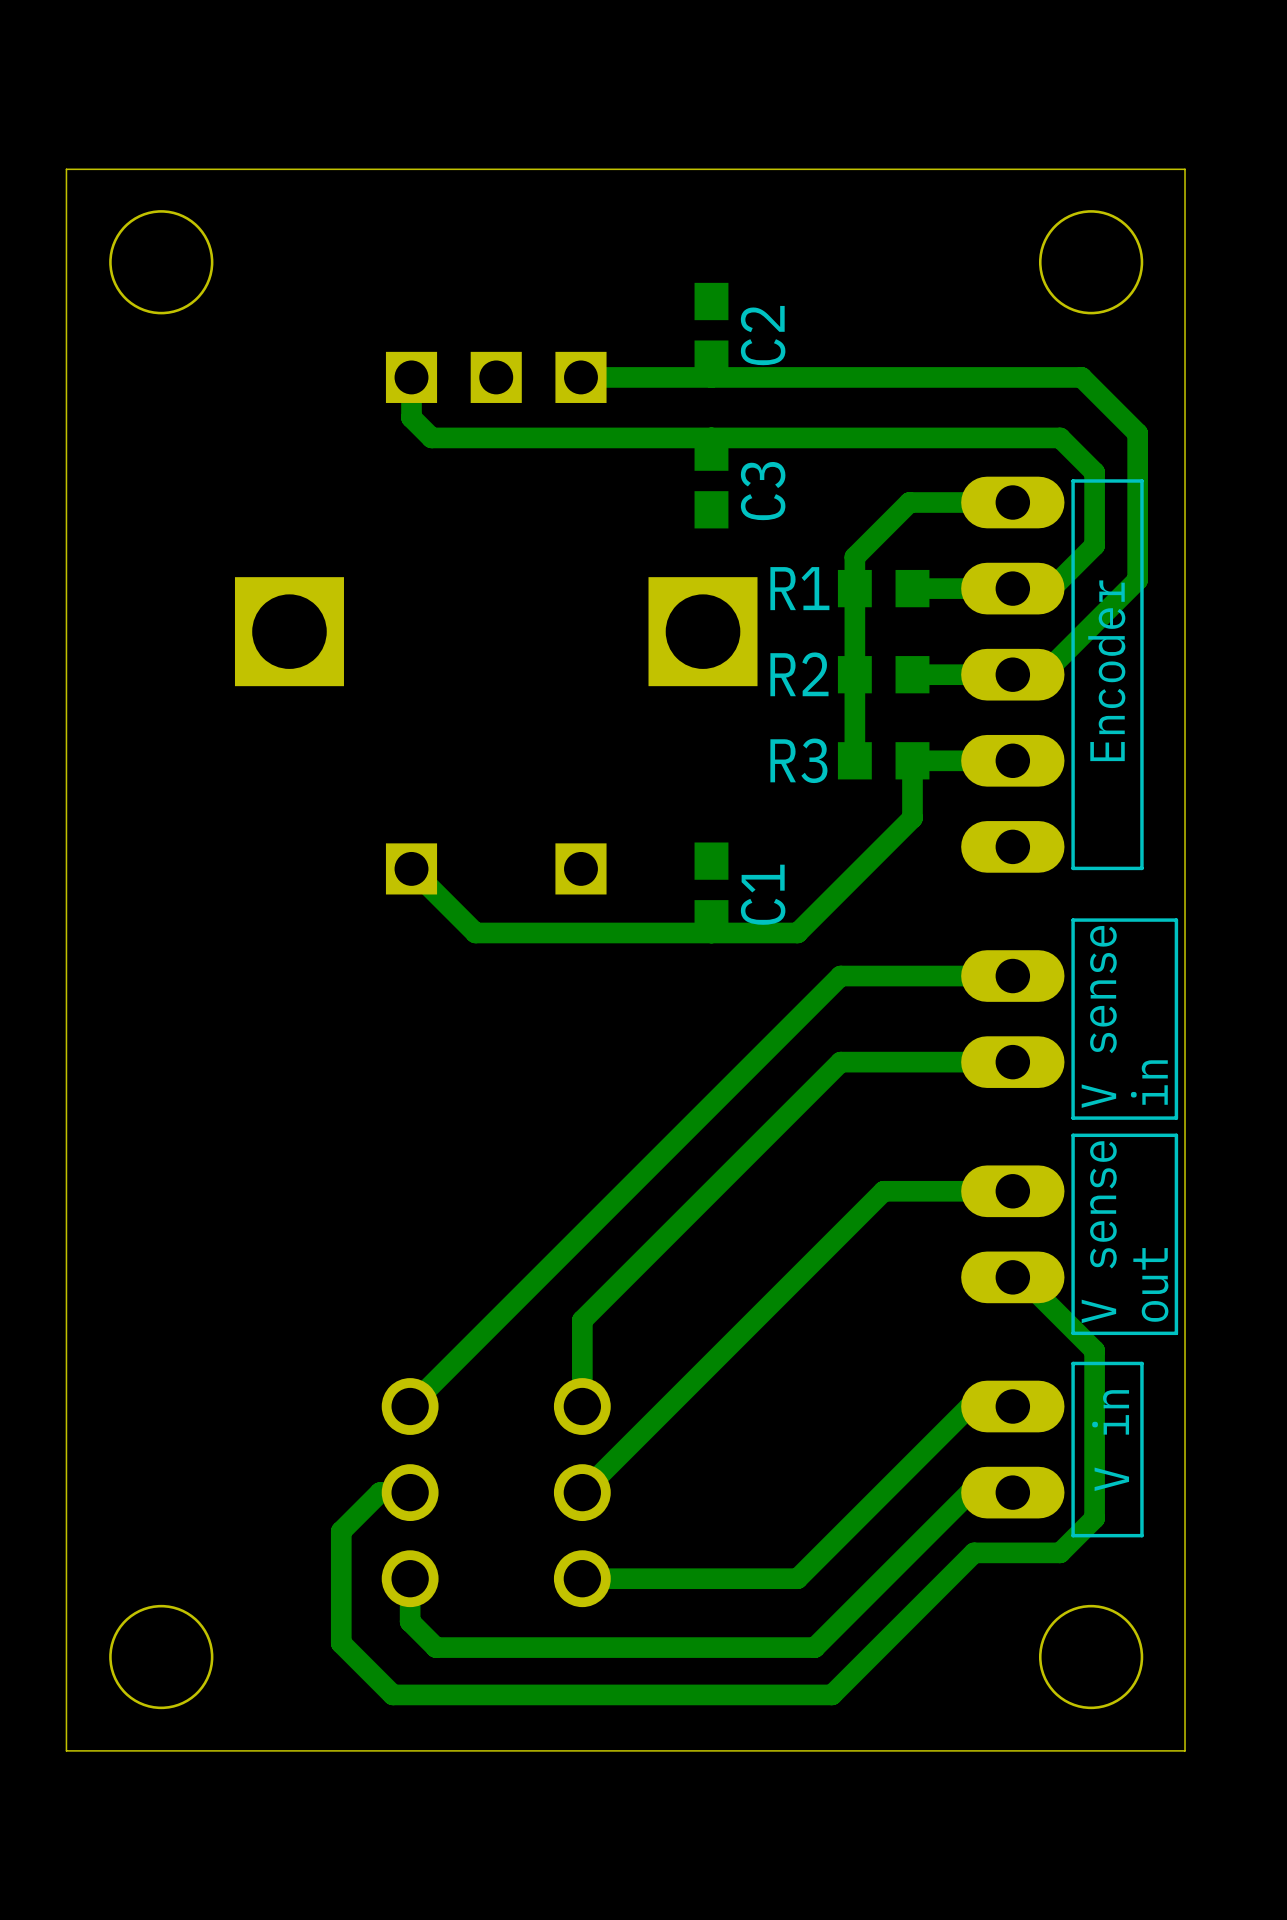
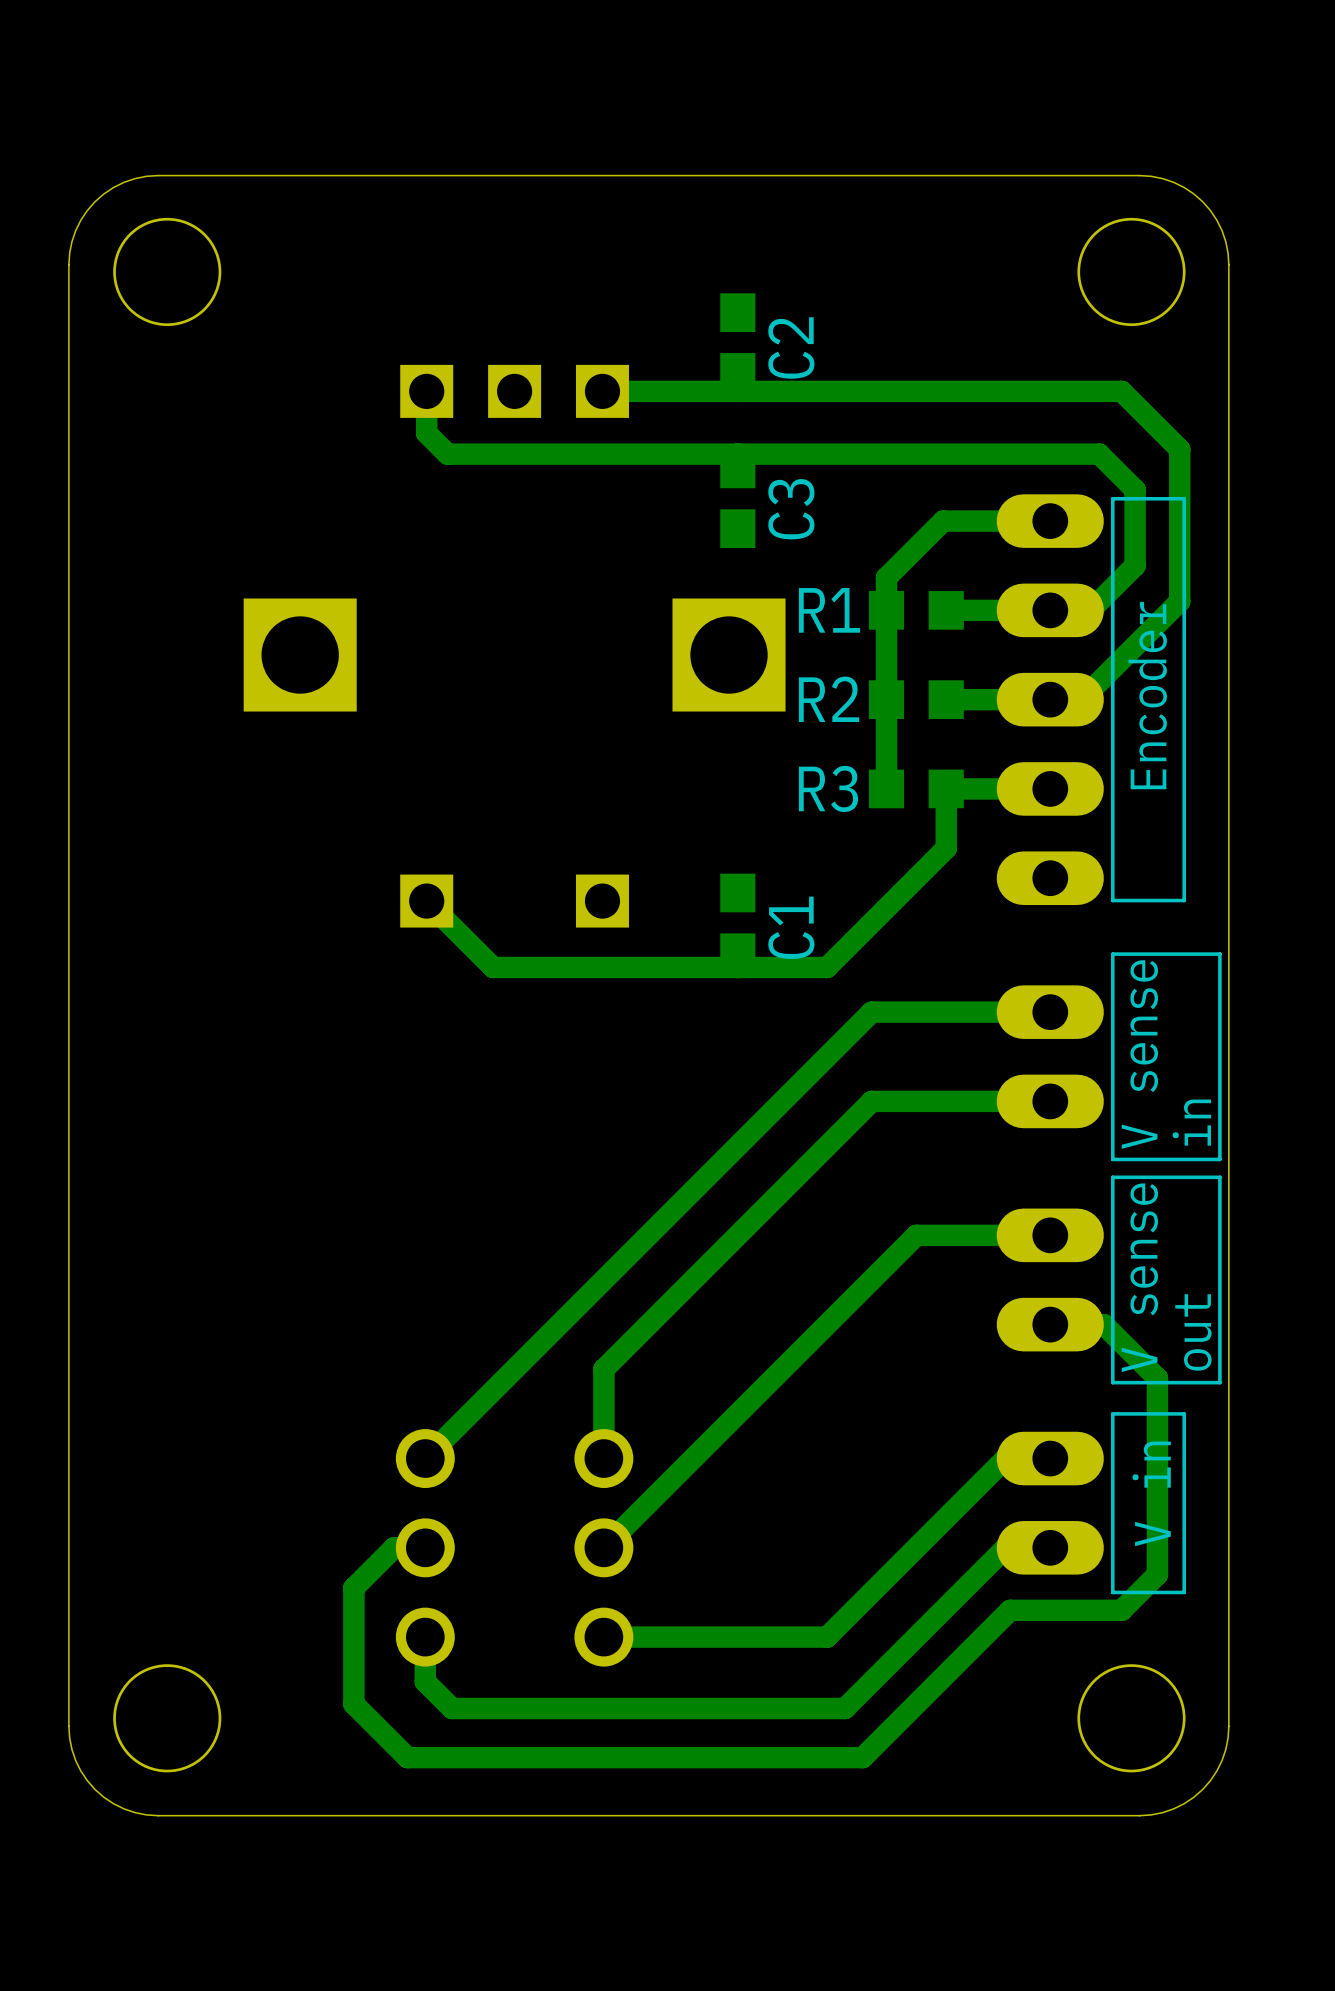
board edge: (152, 169) (66, 169) (66, 255) -> (158, 175) (135, 178) (124, 182) (103, 194) (95, 201) (87, 210) (75, 230) (71, 241) (68, 264)
board edge: (1098, 169) (1185, 169) (1185, 255) -> (1139, 175) (1162, 178) (1173, 182) (1193, 194) (1202, 201) (1210, 210) (1222, 230) (1225, 241) (1228, 264)
bottom track: (1021, 1277) (1094, 1350) (1094, 1518) (1060, 1552) -> (1059, 1324) (1103, 1324) (1157, 1378) (1157, 1574) (1121, 1610) (1099, 1610)
board edge: (66, 1664) (66, 1750) (152, 1750) -> (68, 1726) (71, 1749) (75, 1760) (87, 1780) (95, 1789) (103, 1797) (124, 1808) (135, 1812) (158, 1815)
board edge: (1185, 1664) (1185, 1750) (1098, 1750) -> (1228, 1726) (1225, 1749) (1222, 1760) (1210, 1780) (1202, 1789) (1193, 1797) (1173, 1808) (1162, 1812) (1139, 1815)

